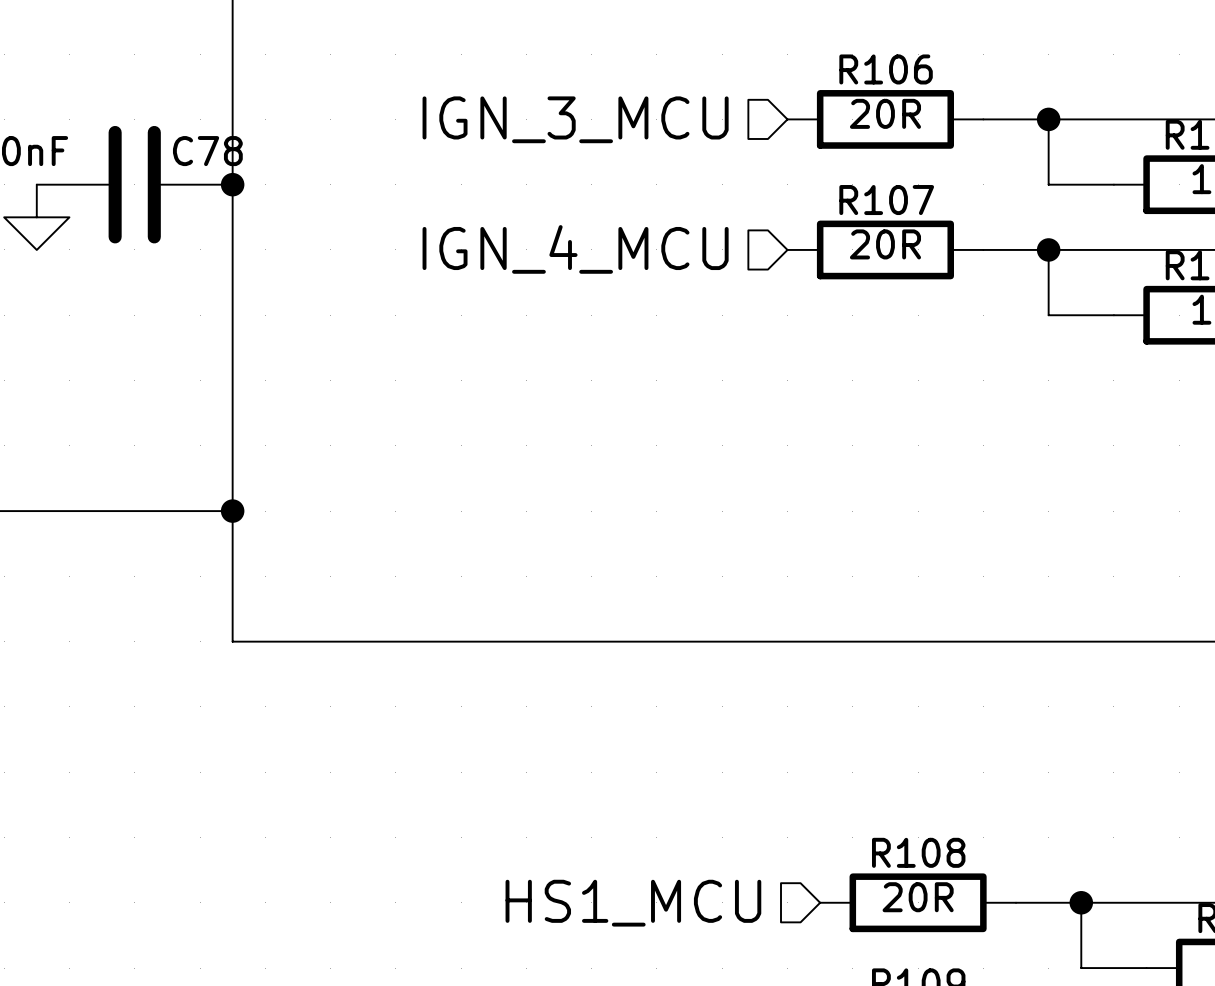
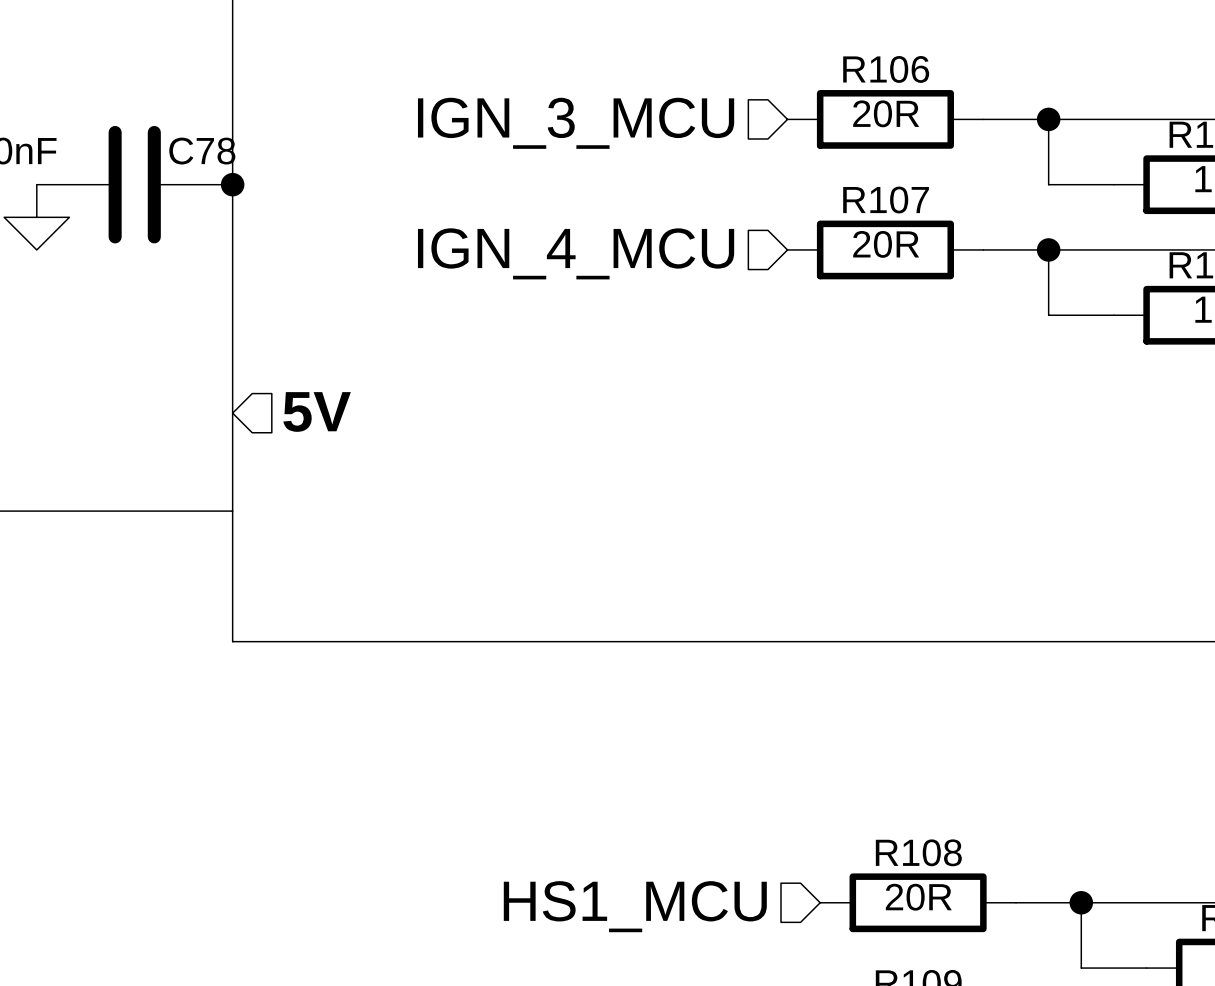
hierarchical label: none -> 5V (317, 411)
junction: (232, 511) -> none

